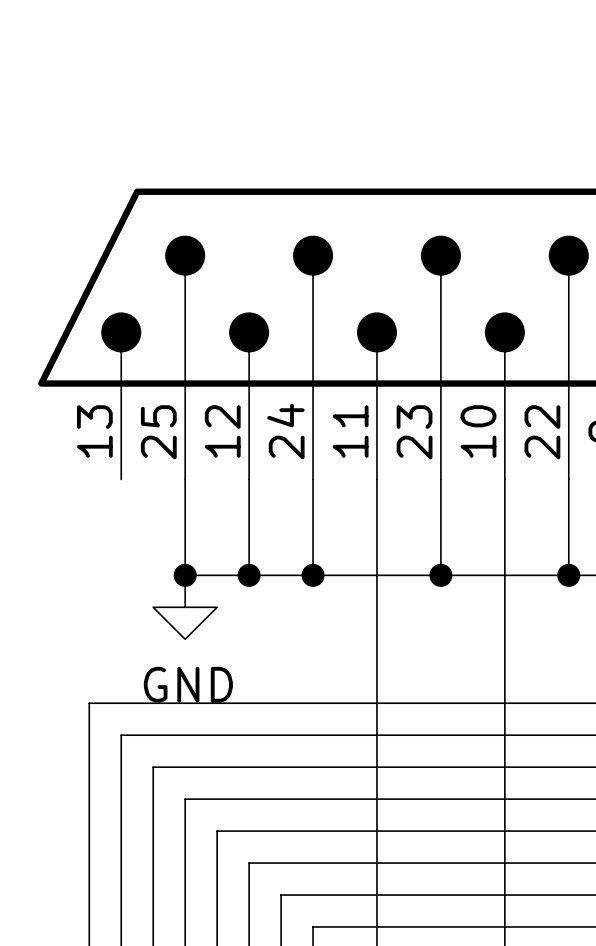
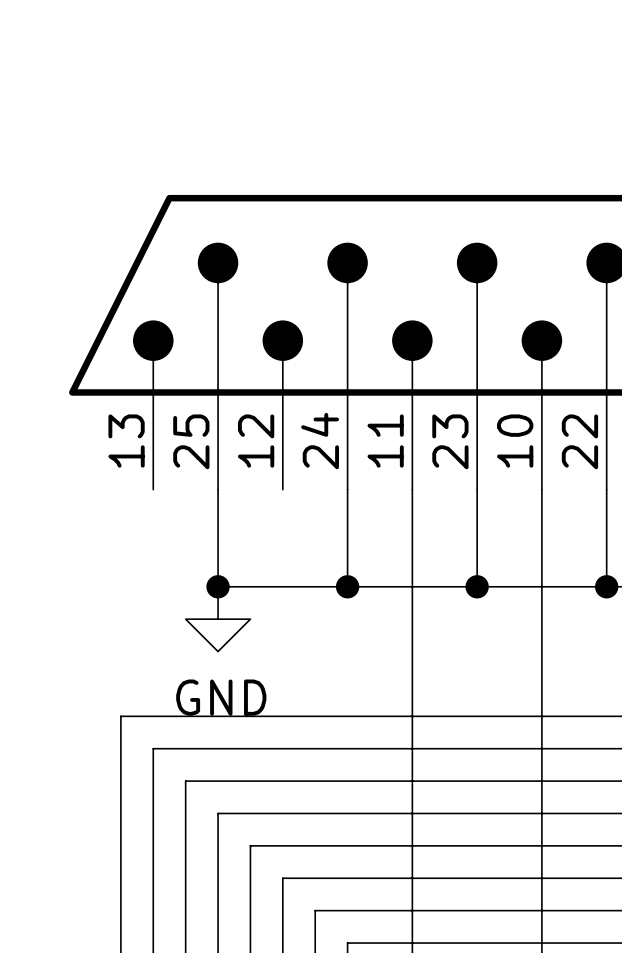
wire: (249, 479) (249, 575) -> none
junction: (249, 575) -> none

